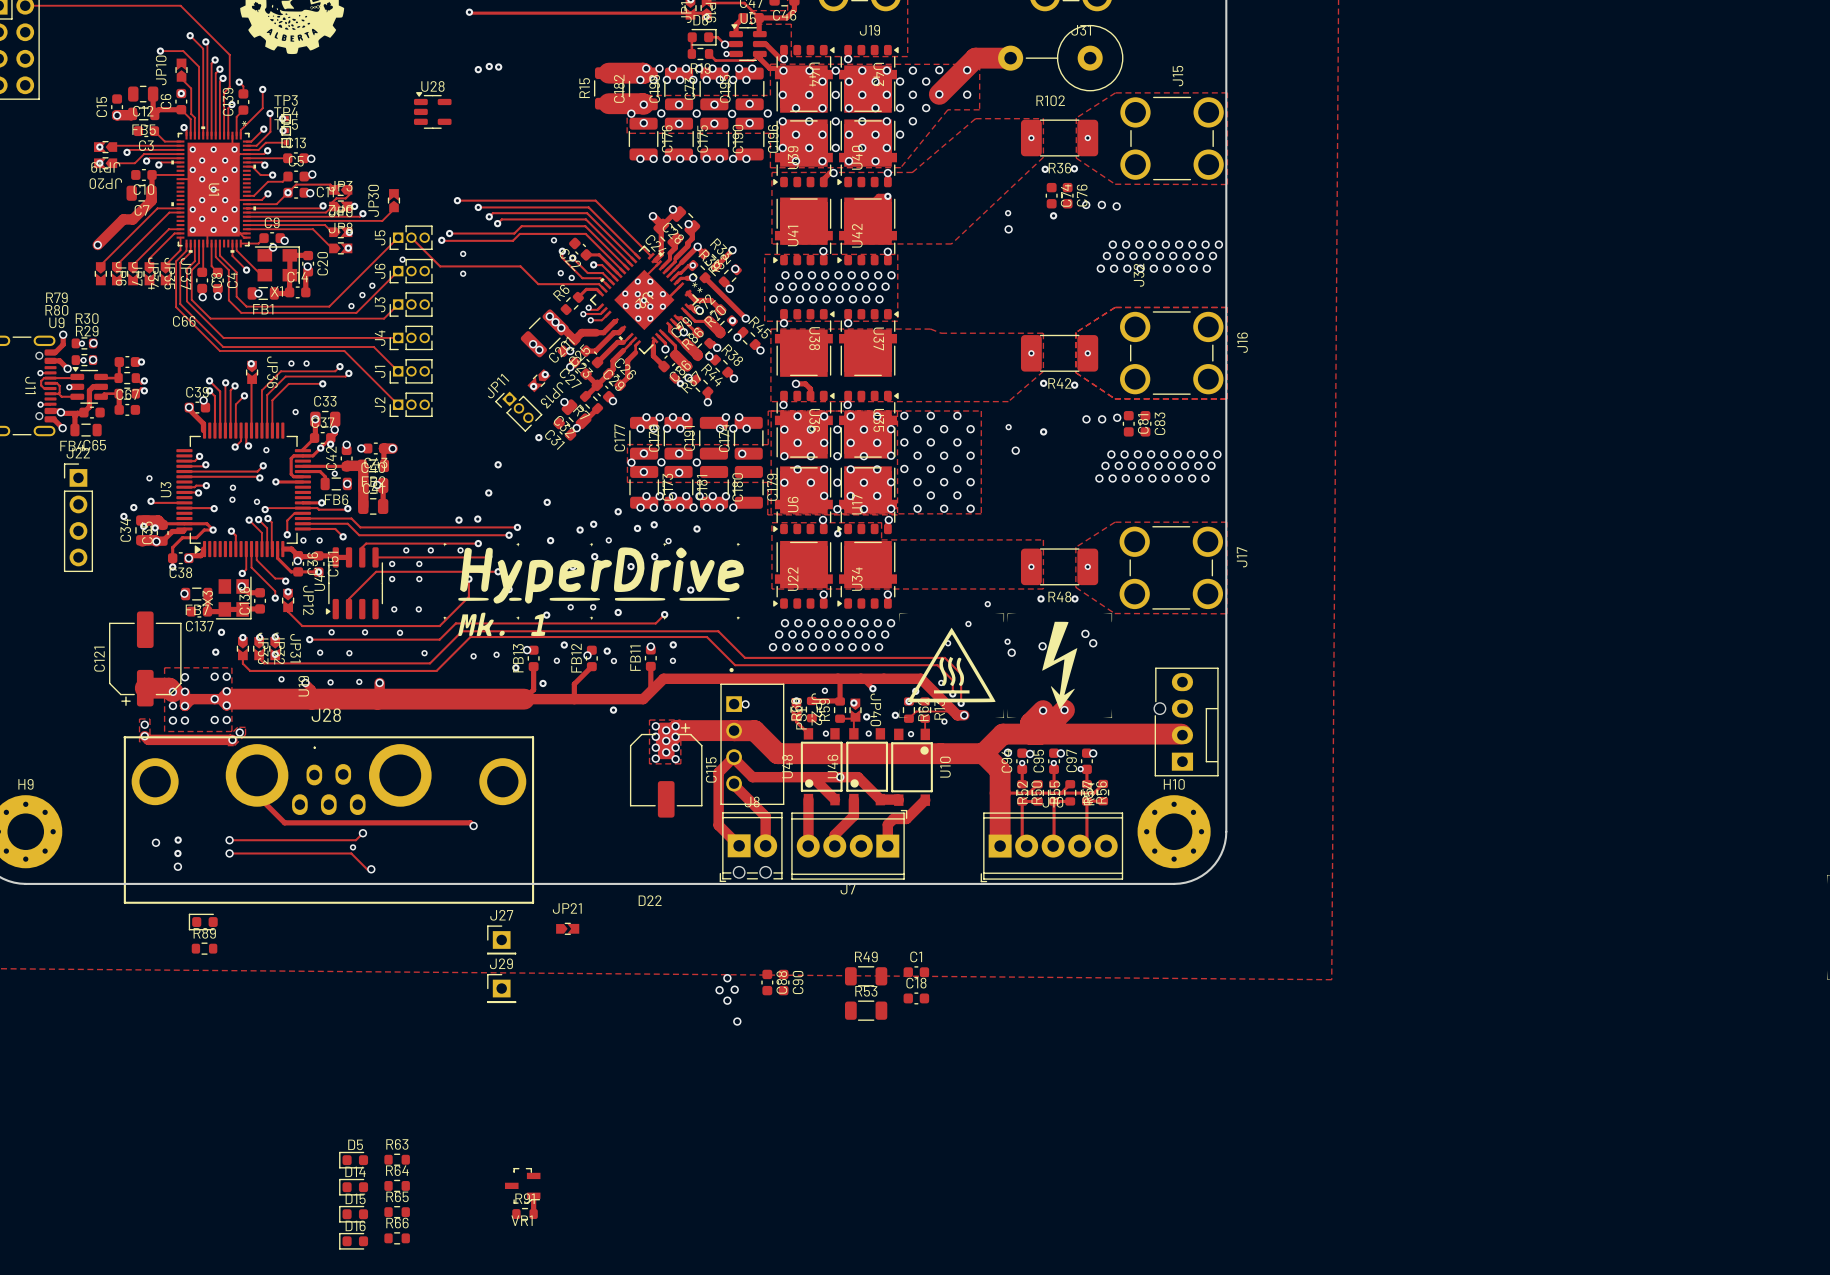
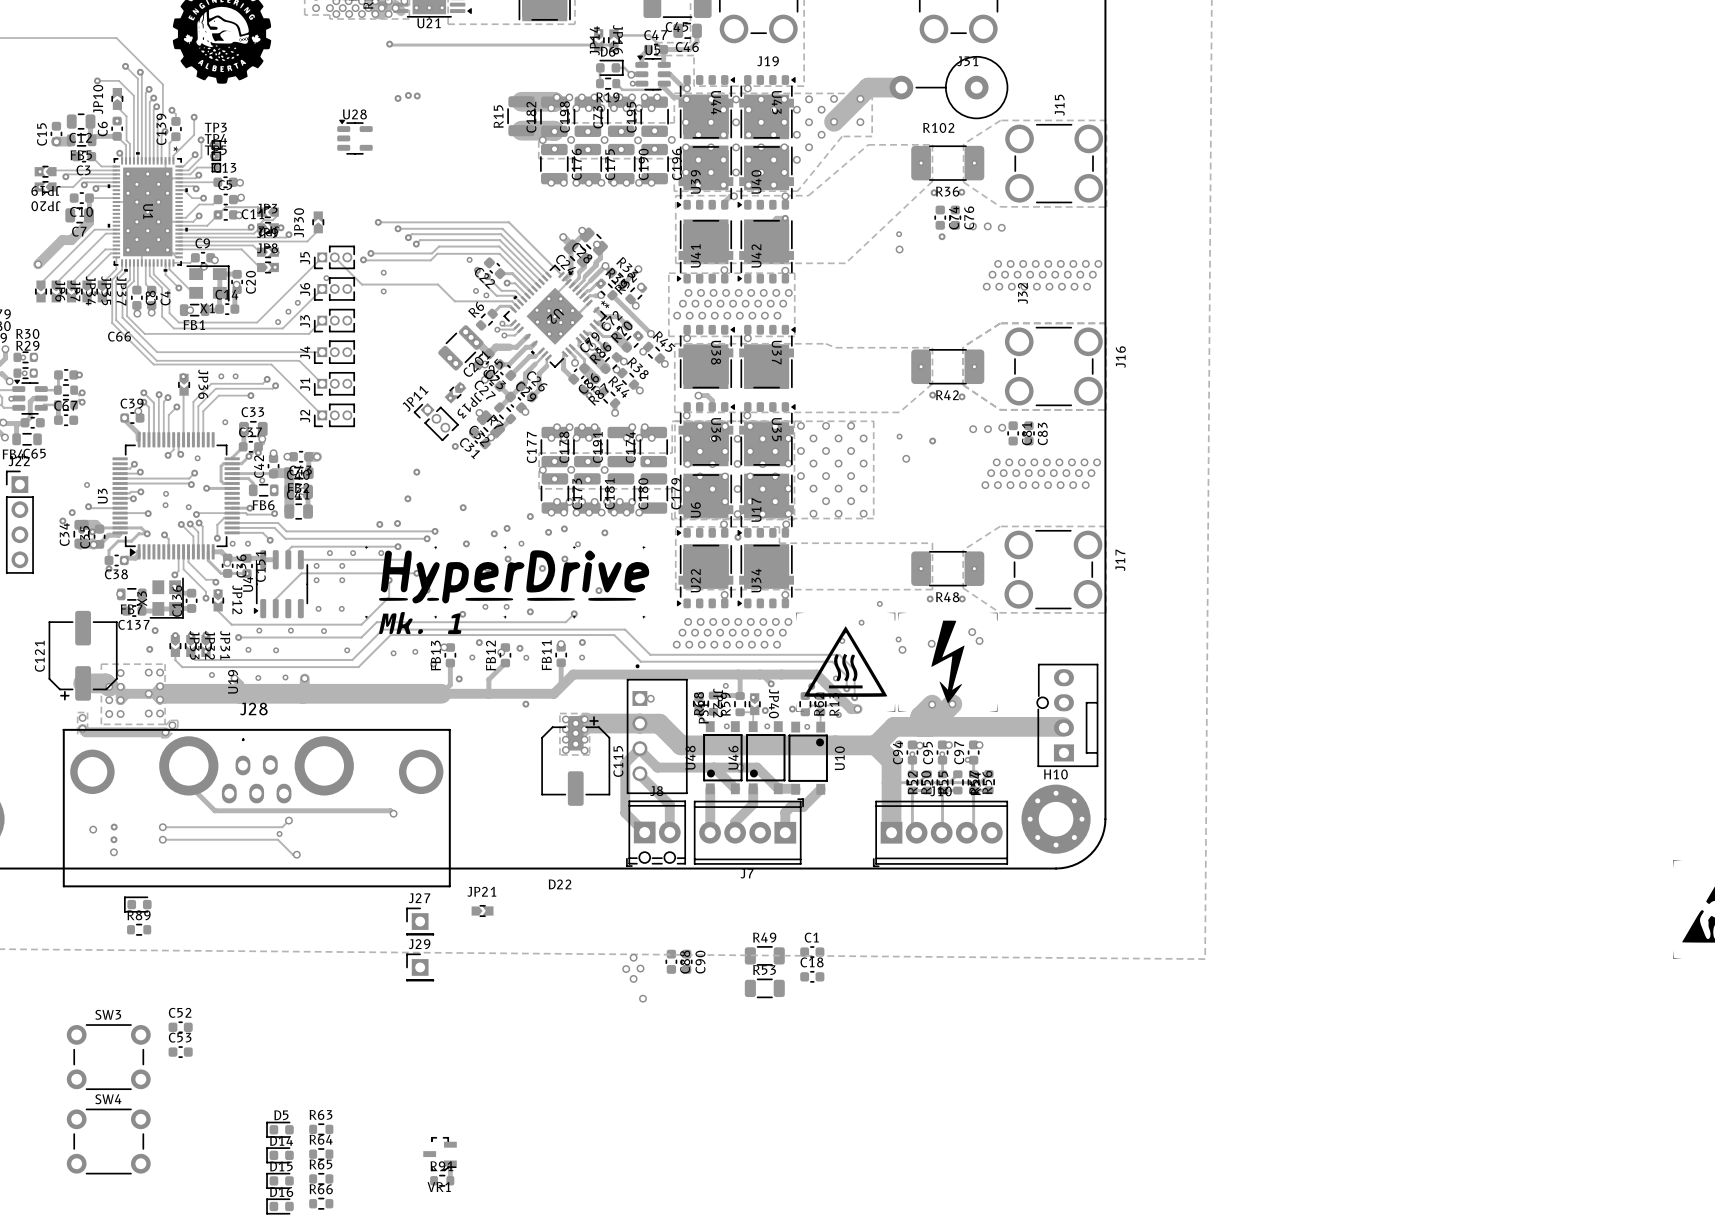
C52: none -> (180, 1027)
C53: none -> (180, 1052)
SW3: none -> (108, 1057)
SW4: none -> (108, 1141)

